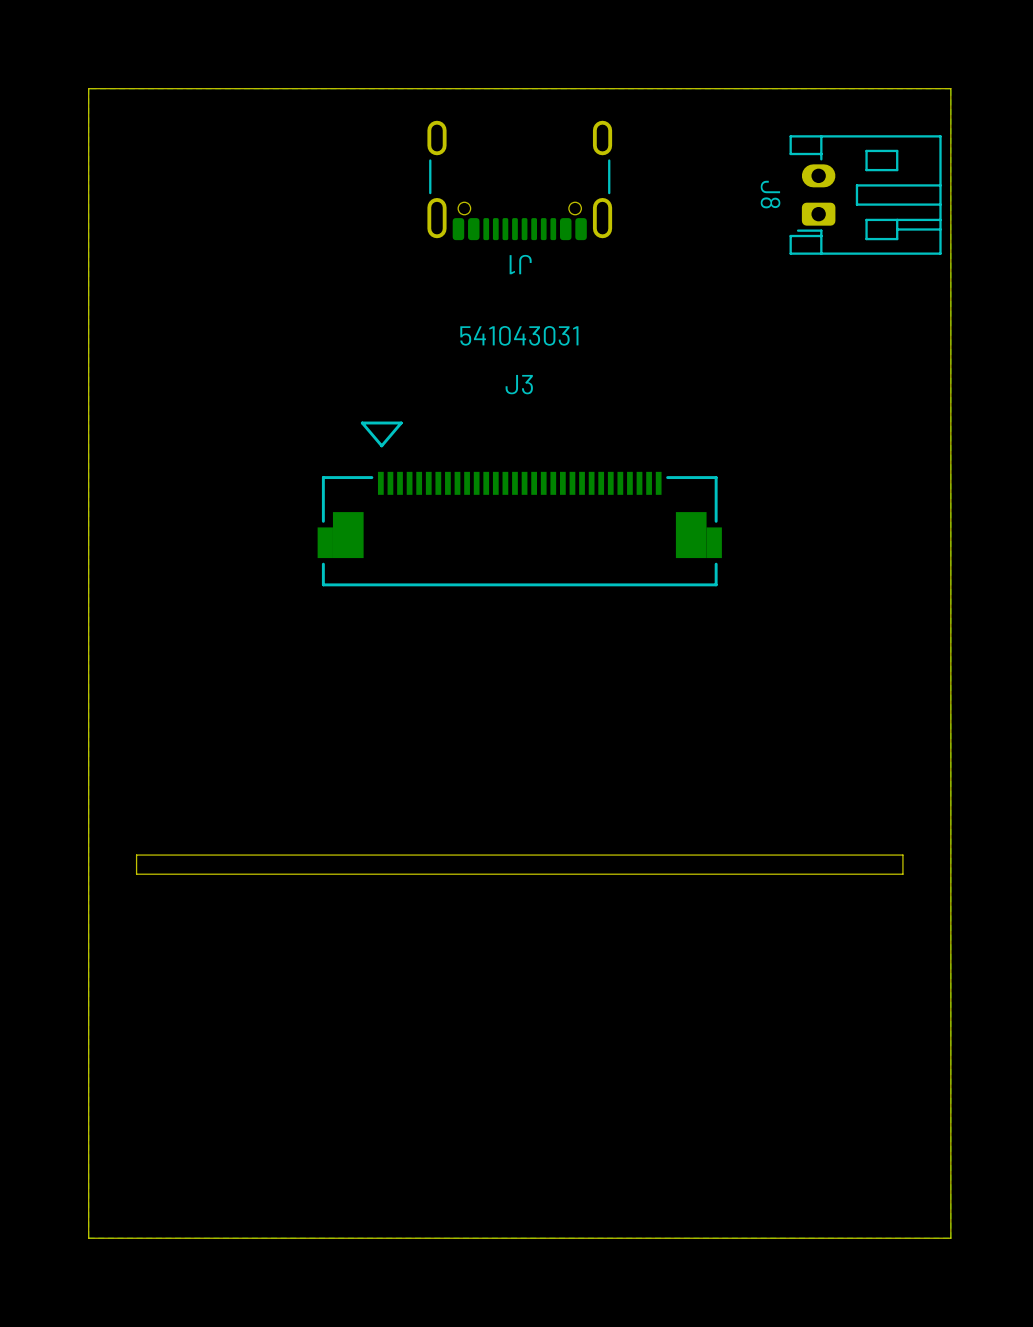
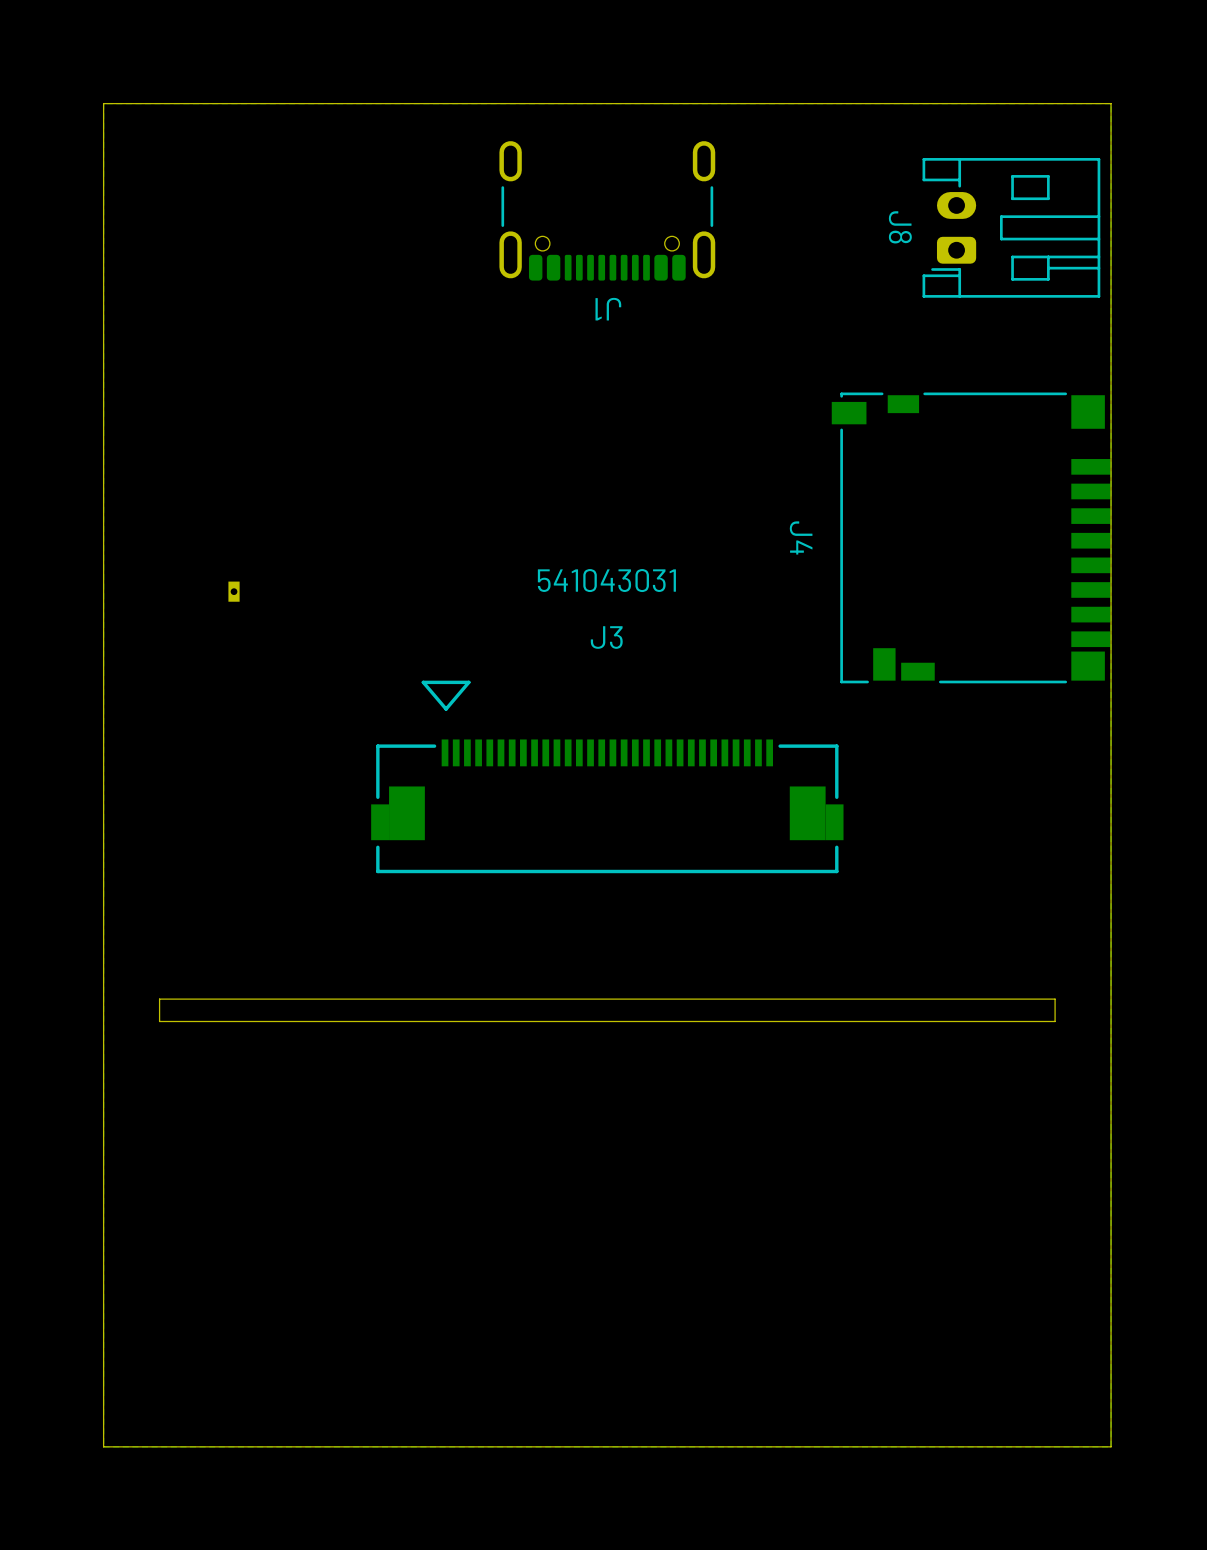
J4: none -> (971, 537)
J3 position: (519, 503) -> (607, 776)
part: none -> (234, 591)

